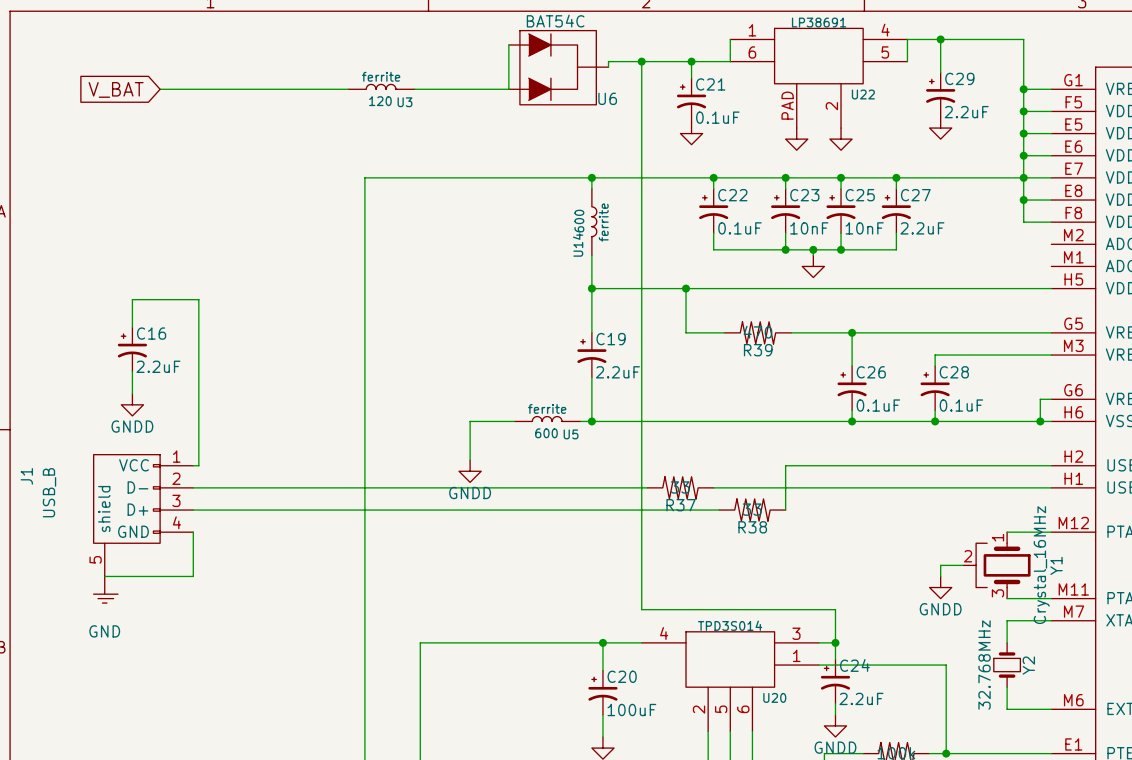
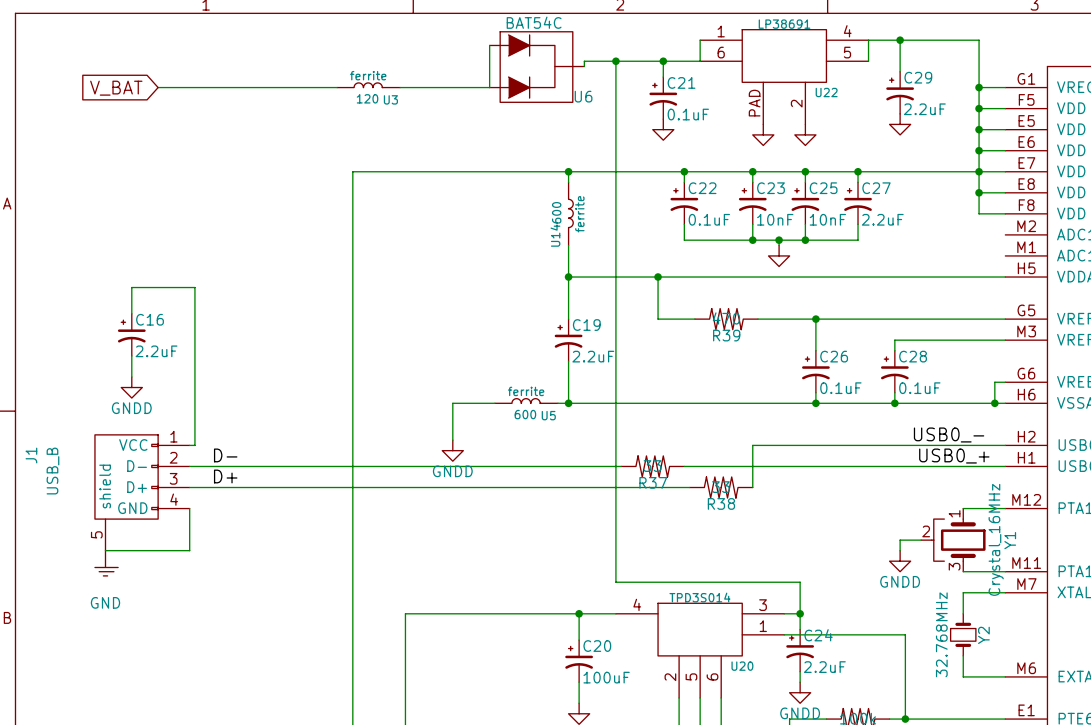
label: none -> USB0_- (949, 434)
label: none -> D- (225, 455)
label: none -> USB0_+ (954, 456)
label: none -> D+ (225, 476)

